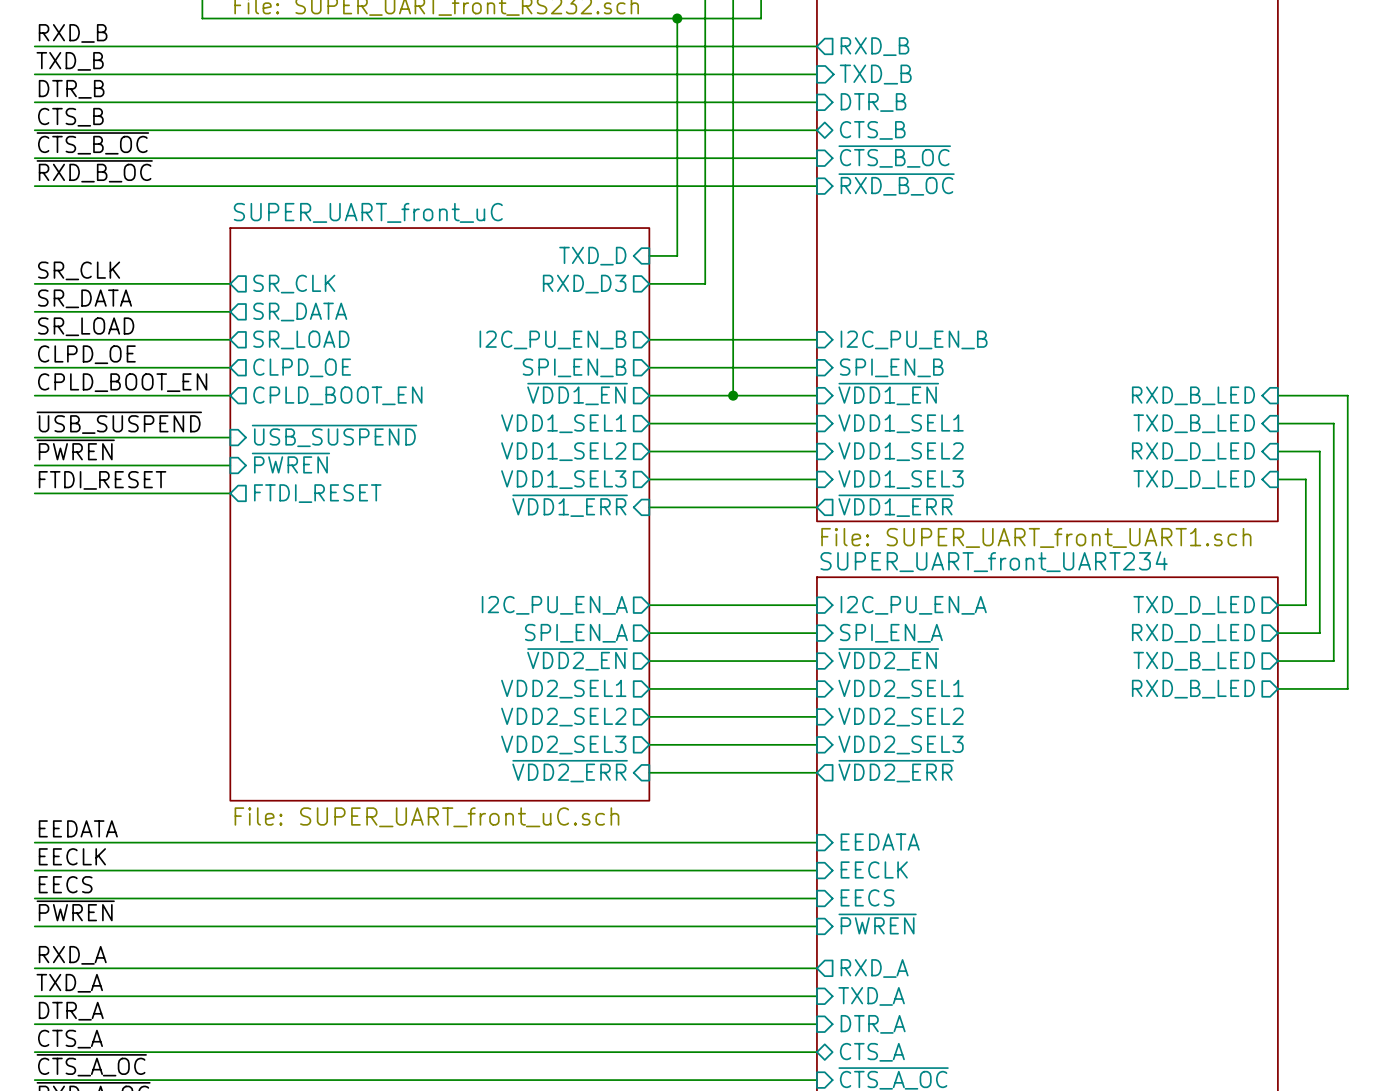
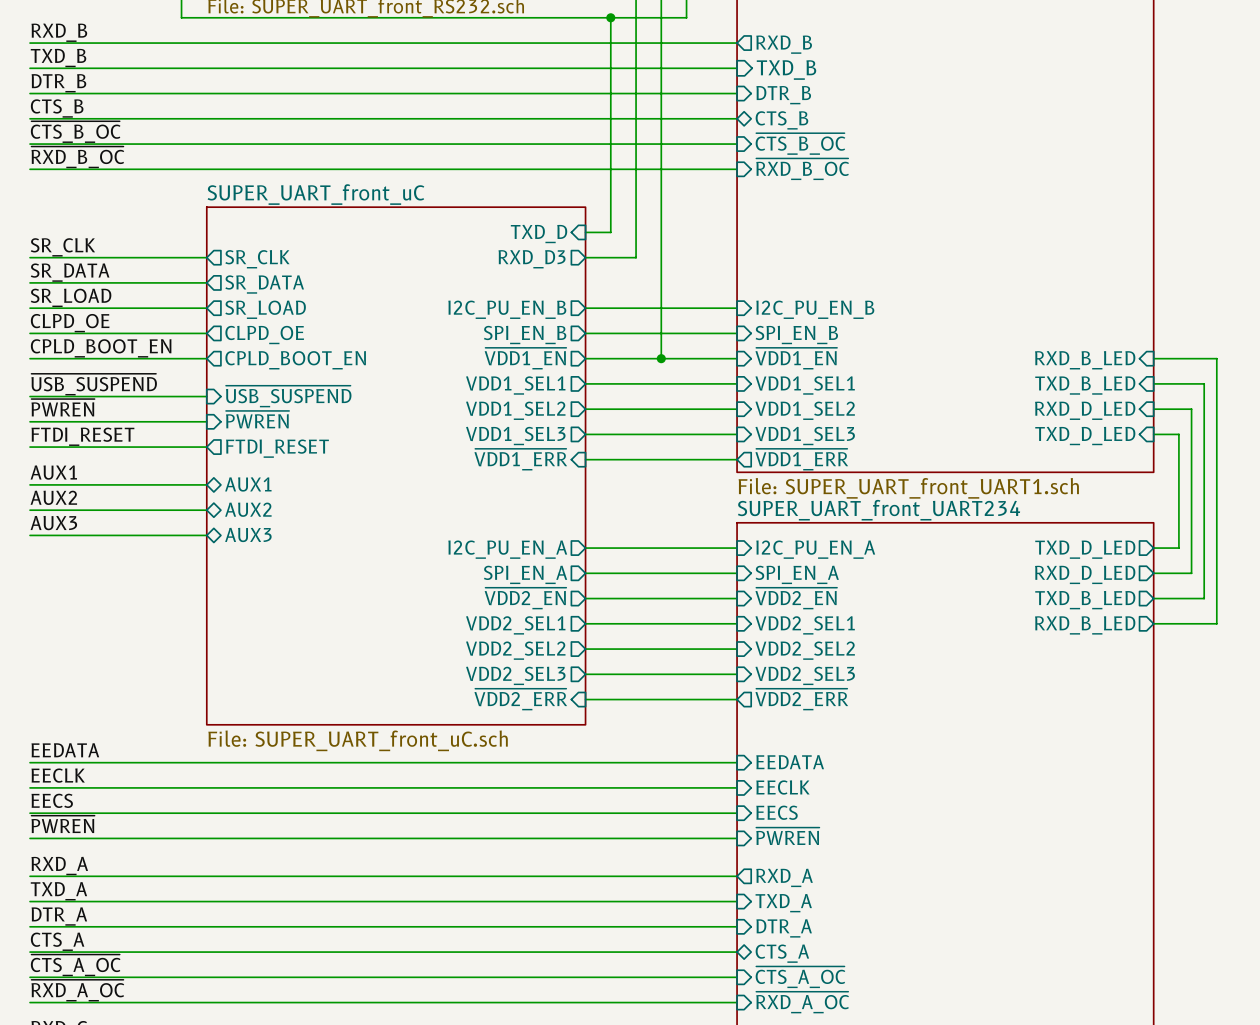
label: none -> AUX1 (53, 472)
sheet pin: none -> AUX1 (248, 484)
wire: none -> (30, 484) (206, 484)
label: none -> AUX2 (53, 497)
sheet pin: none -> AUX2 (248, 509)
wire: none -> (30, 510) (206, 510)
label: none -> AUX3 (53, 523)
sheet pin: none -> AUX3 (248, 534)
wire: none -> (30, 535) (206, 535)

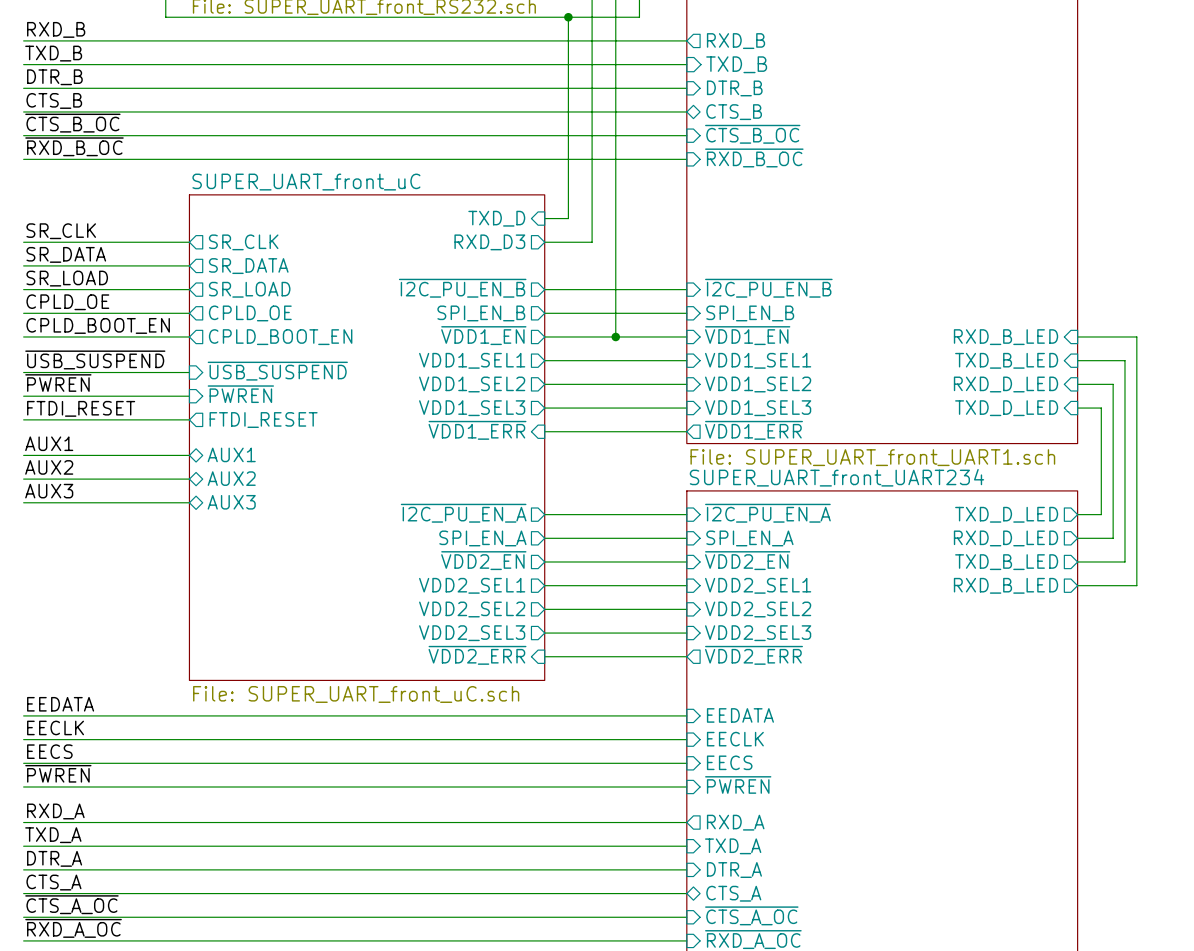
sheet pin: I2C_PU_EN_B (507, 309) -> ~{I2C_PU_EN_B} (462, 288)
sheet pin: I2C_PU_EN_B (815, 309) -> ~{I2C_PU_EN_B} (768, 288)
label: CLPD_OE (70, 323) -> CPLD_OE (67, 302)
sheet pin: CLPD_OE (264, 335) -> CPLD_OE (250, 313)
sheet pin: I2C_PU_EN_A (507, 549) -> ~{I2C_PU_EN_A} (463, 513)
sheet pin: I2C_PU_EN_A (815, 549) -> ~{I2C_PU_EN_A} (767, 513)

